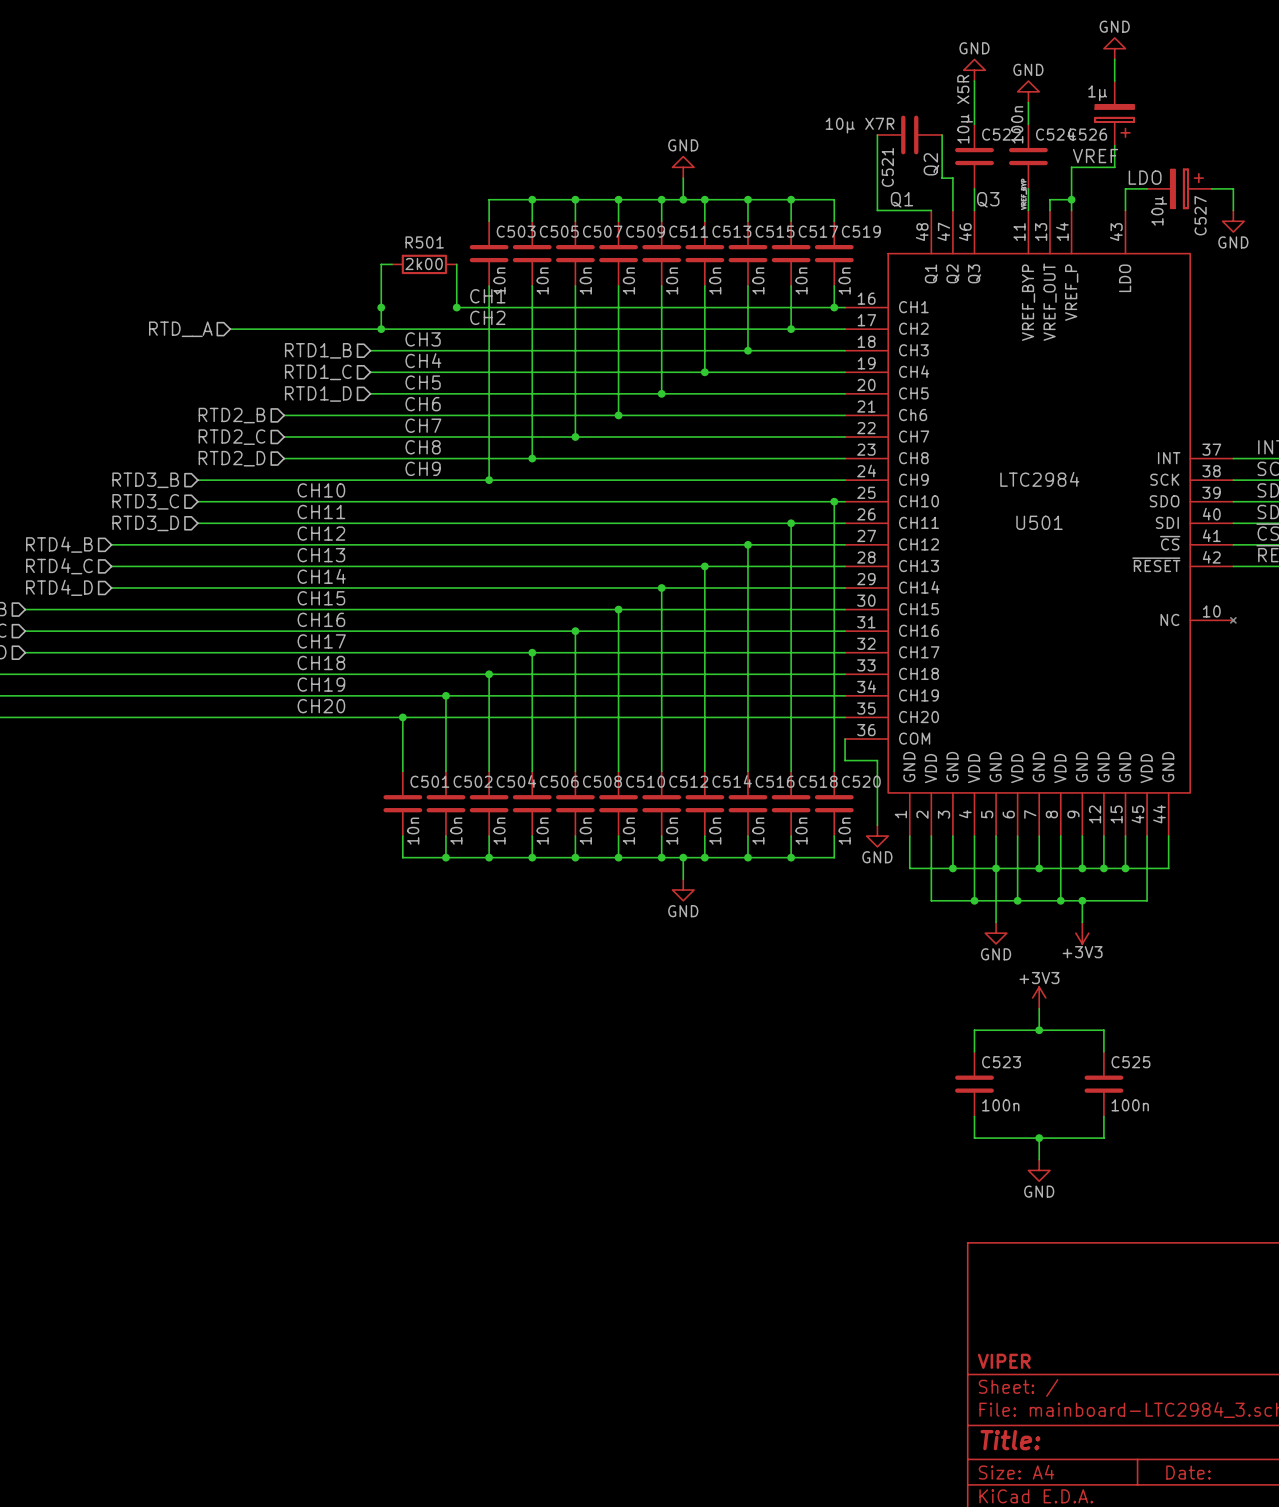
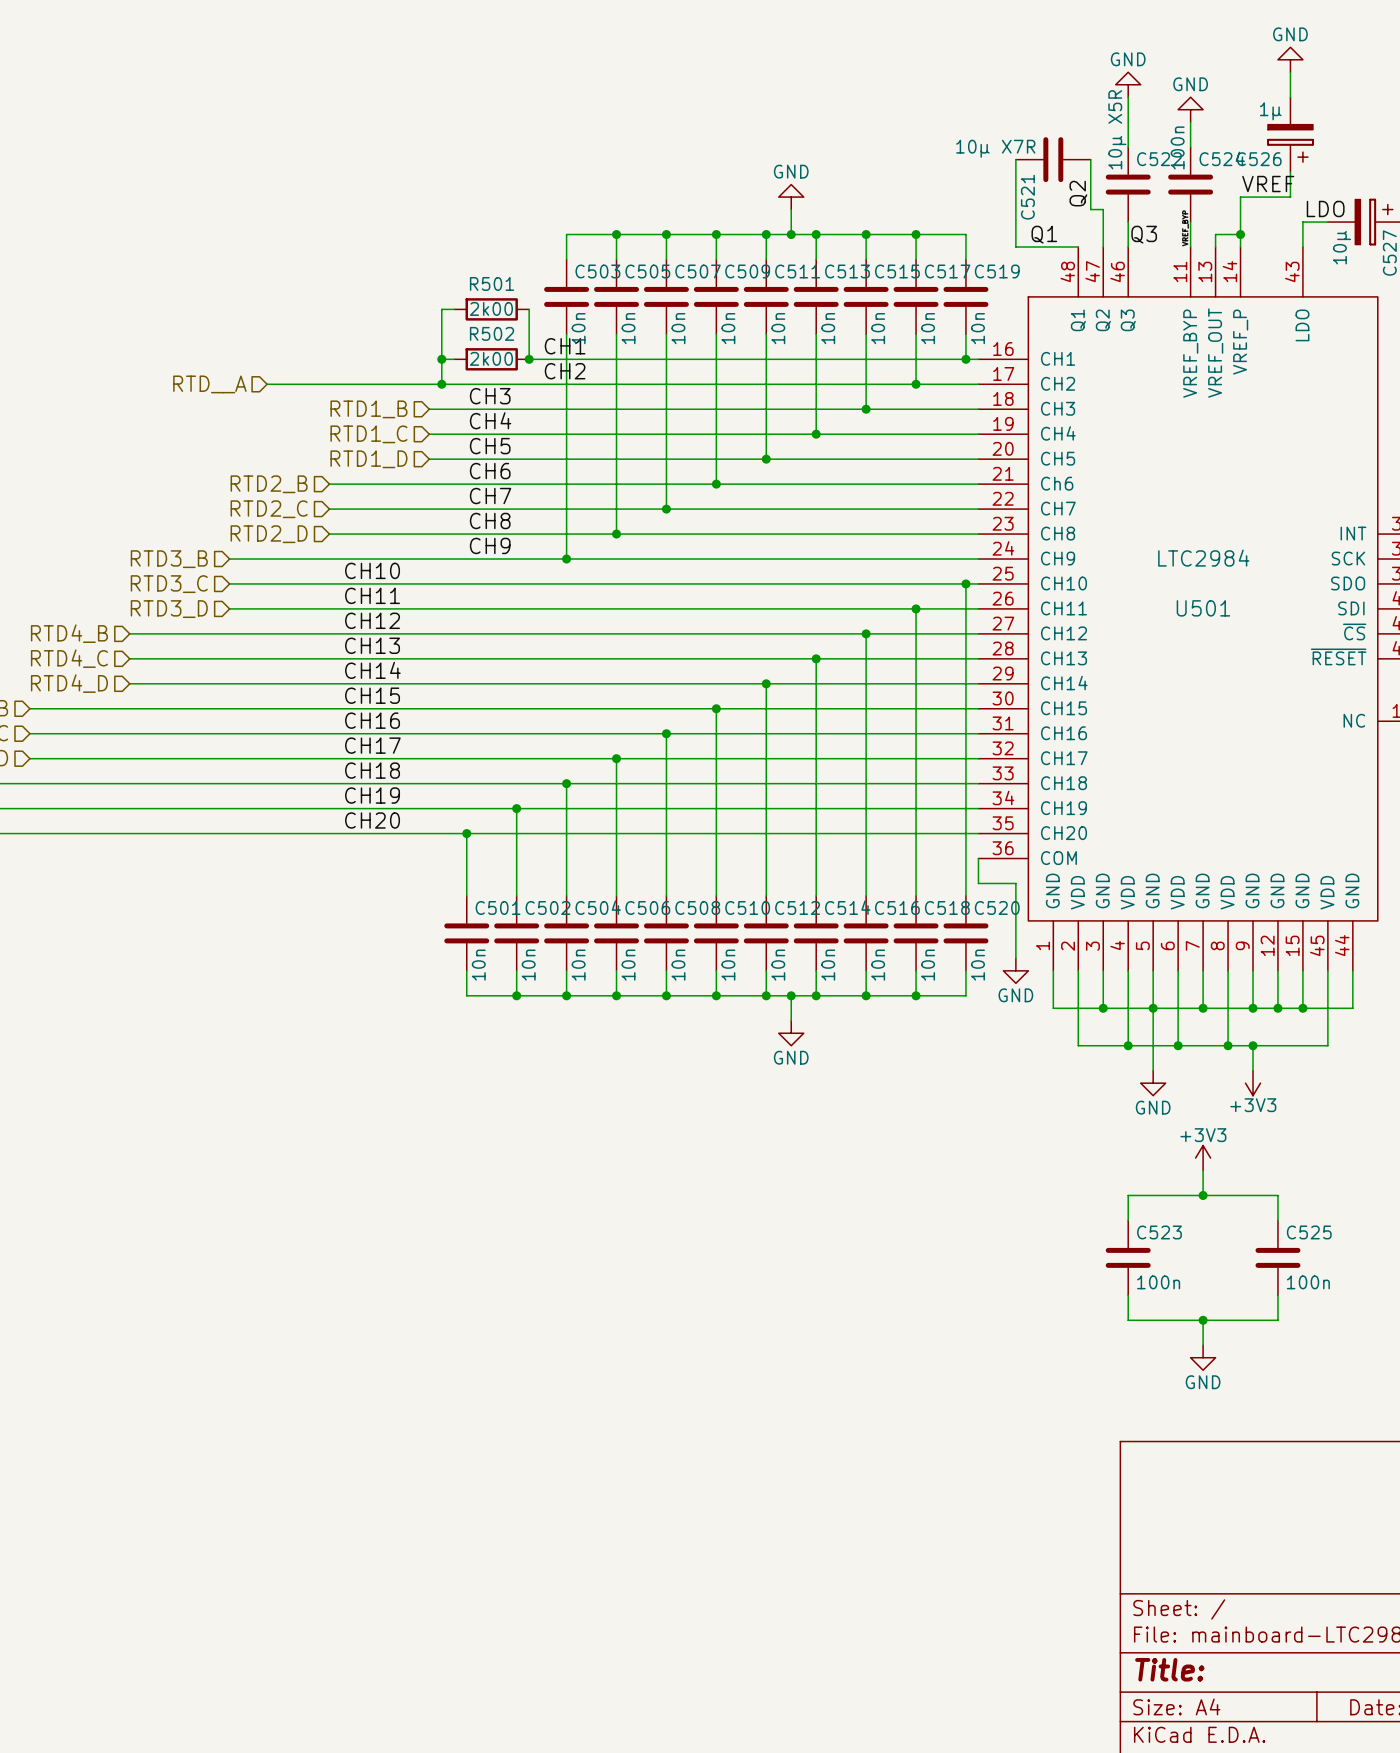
wire: none -> (441, 359) (454, 359)
R502: none -> 2k00 (491, 359)
title block: VIPER (1004, 1361) -> none

